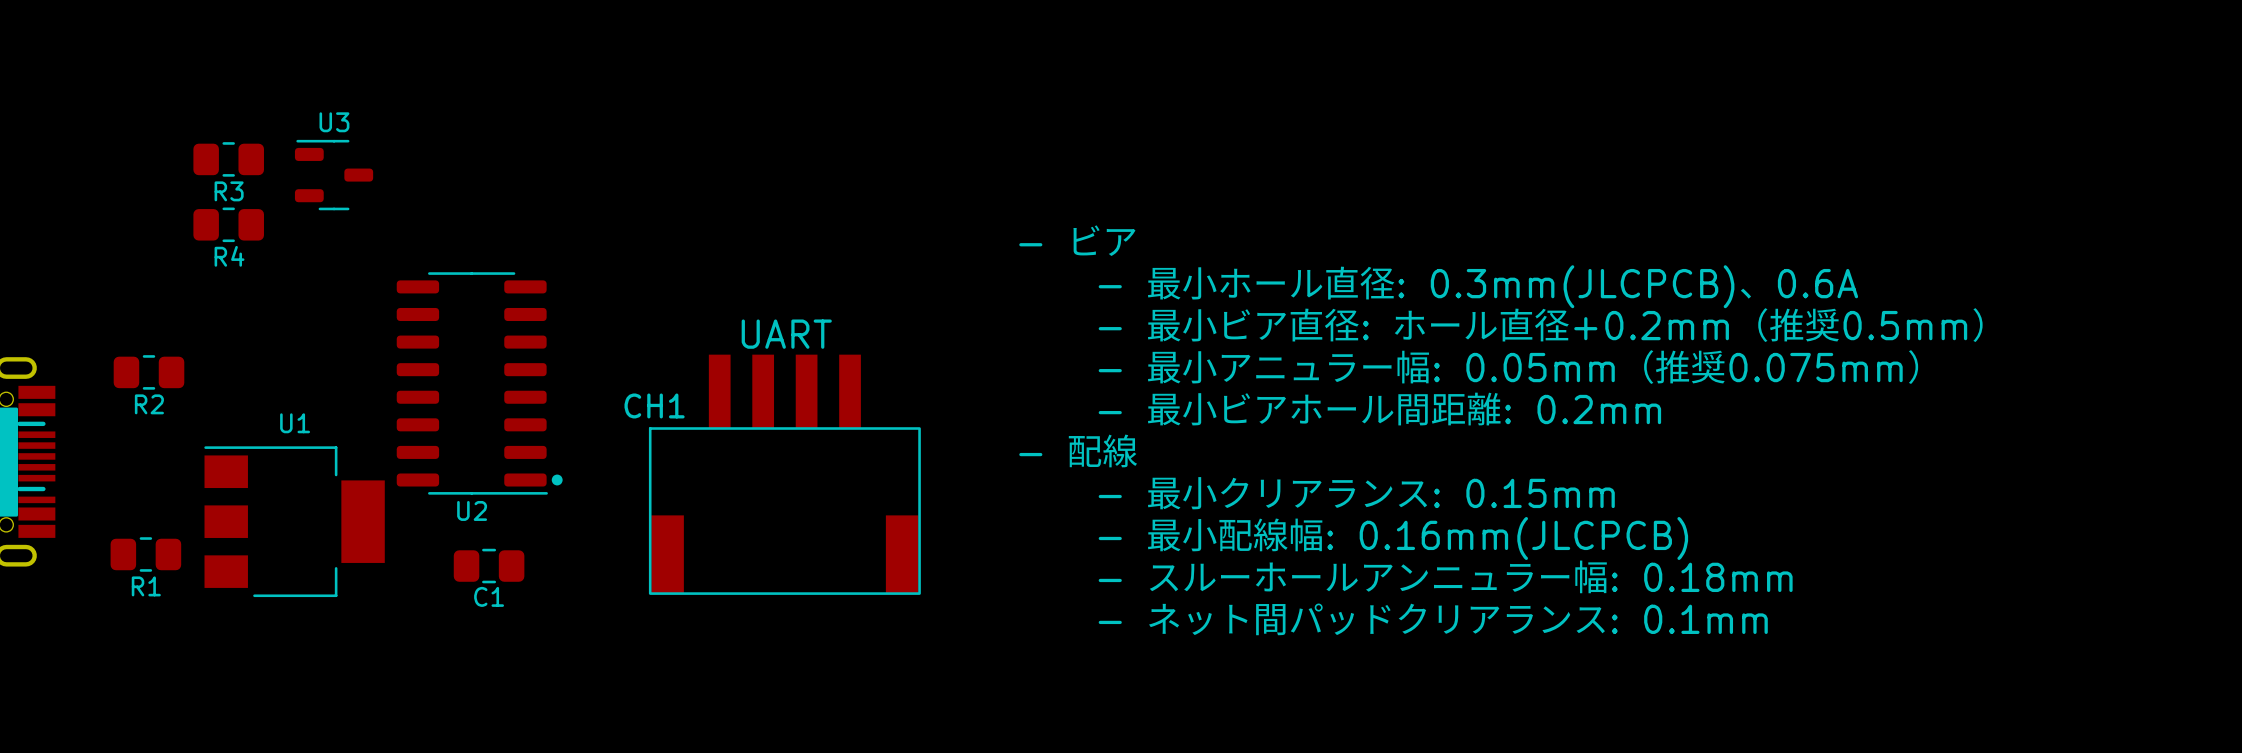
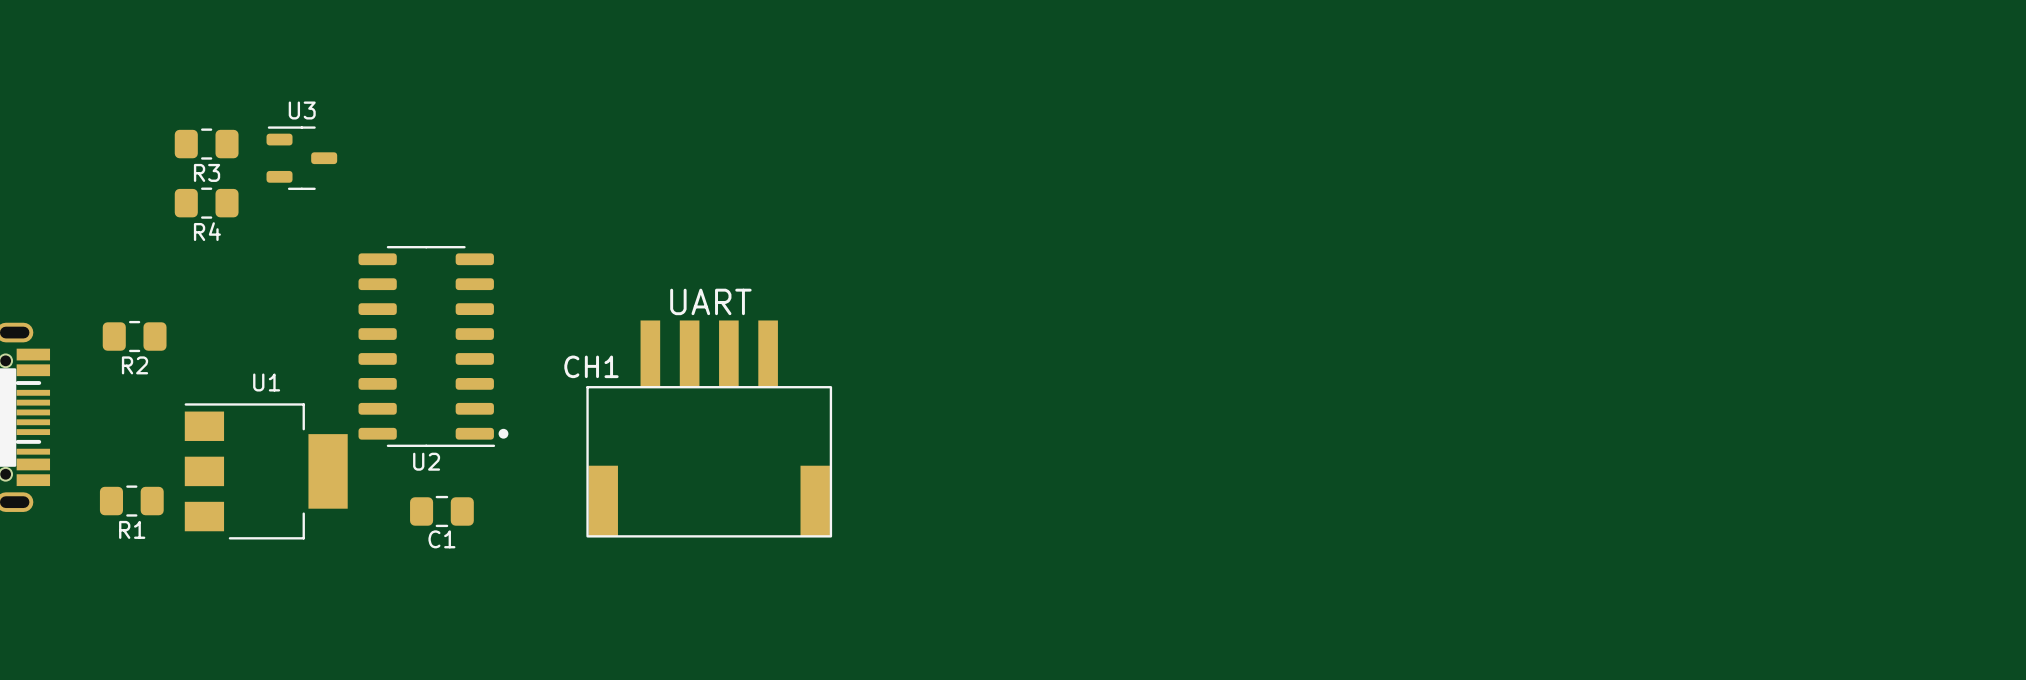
text: - ビア (1078, 240) -> none
text: - 最小ホール直径: 0.3mm(JLCPCB)、0.6A (1478, 286) -> none
text: - 最小ビア直径: ホール直径+0.2mm（推奨0.5mm） (1541, 325) -> none
text: - 最小アニュラー幅: 0.05mm（推奨0.075mm） (1509, 367) -> none
text: - 最小ビアホール間距離: 0.2mm (1379, 409) -> none
text: - 配線 (1078, 450) -> none
text: - 最小クリアランス: 0.15mm (1356, 493) -> none
text: - 最小配線幅: 0.16mm(JLCPCB) (1393, 538) -> none
text: - スルーホールアンニュラー幅: 0.18mm (1445, 576) -> none
text: - ネット間パッドクリアランス: 0.1mm (1433, 619) -> none

